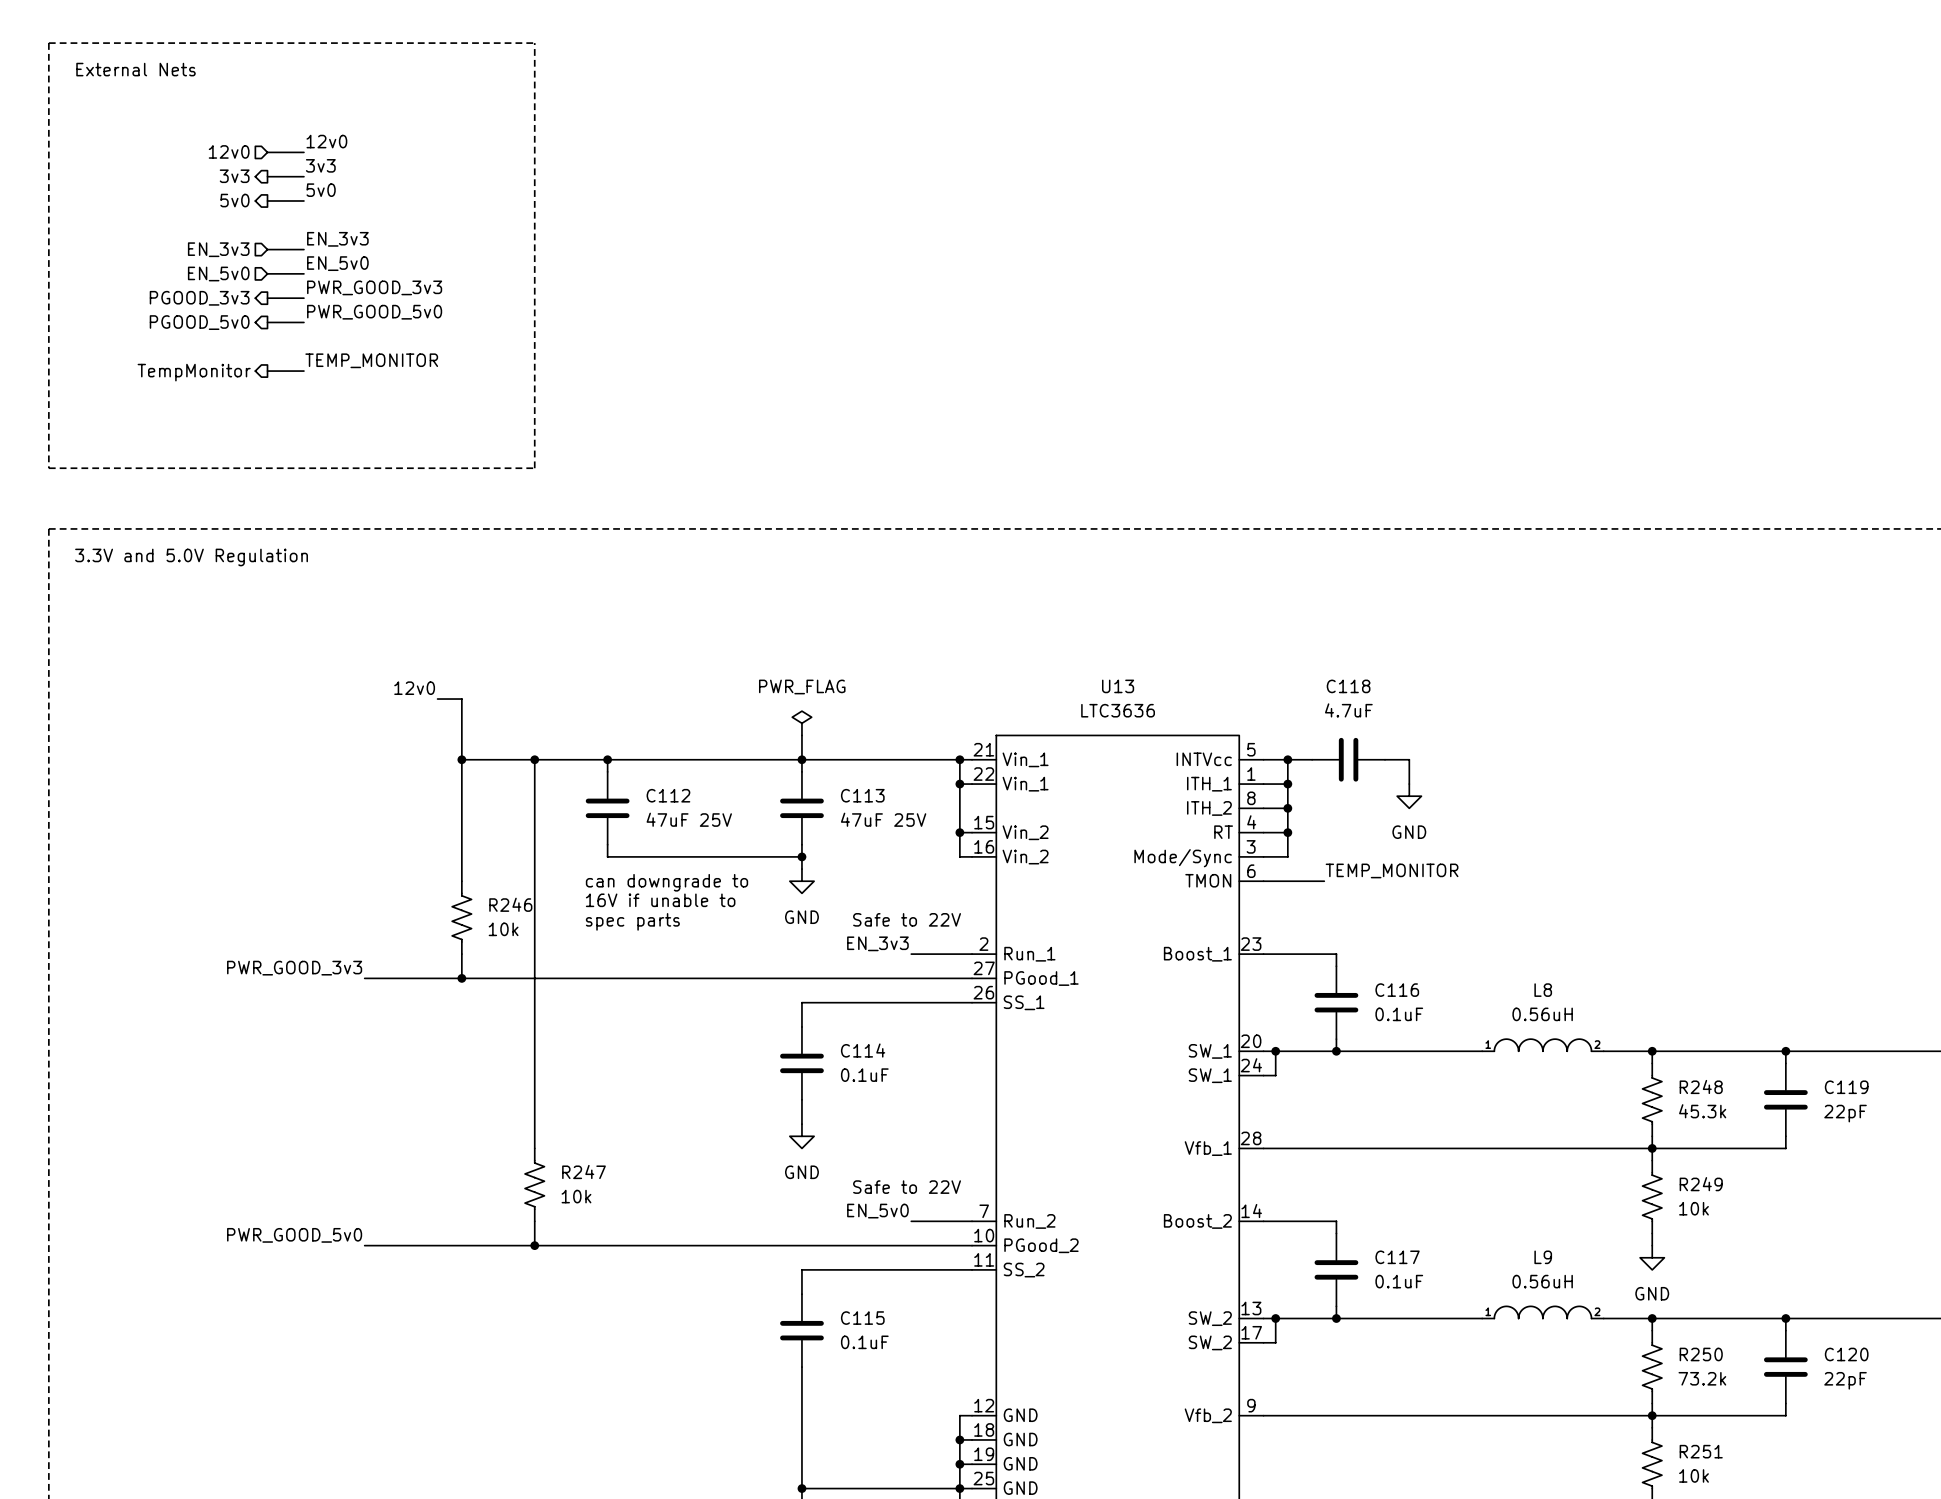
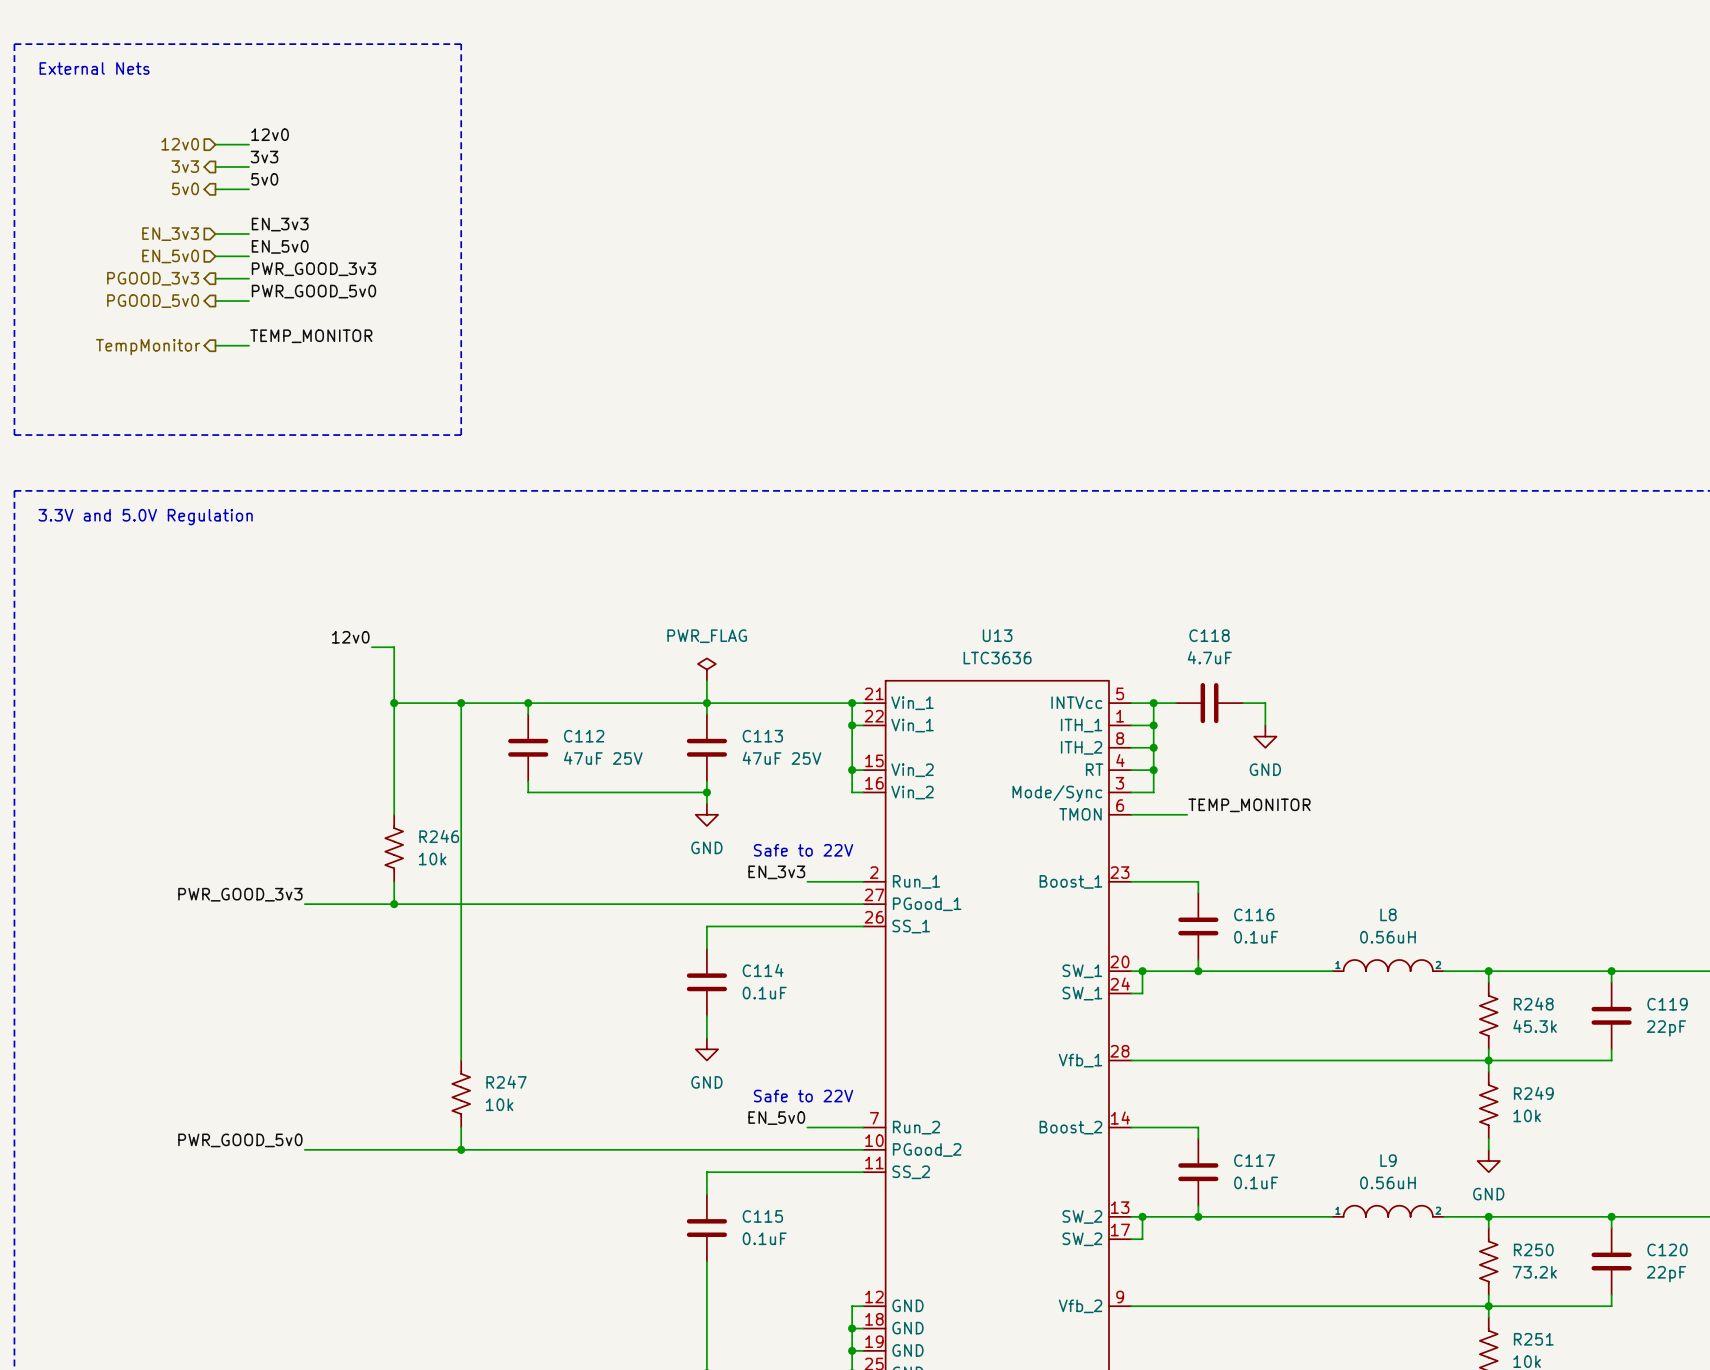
text: can downgrade to (667, 882) -> none
text: 16V if unable to (660, 900) -> none
text: spec parts (632, 921) -> none

